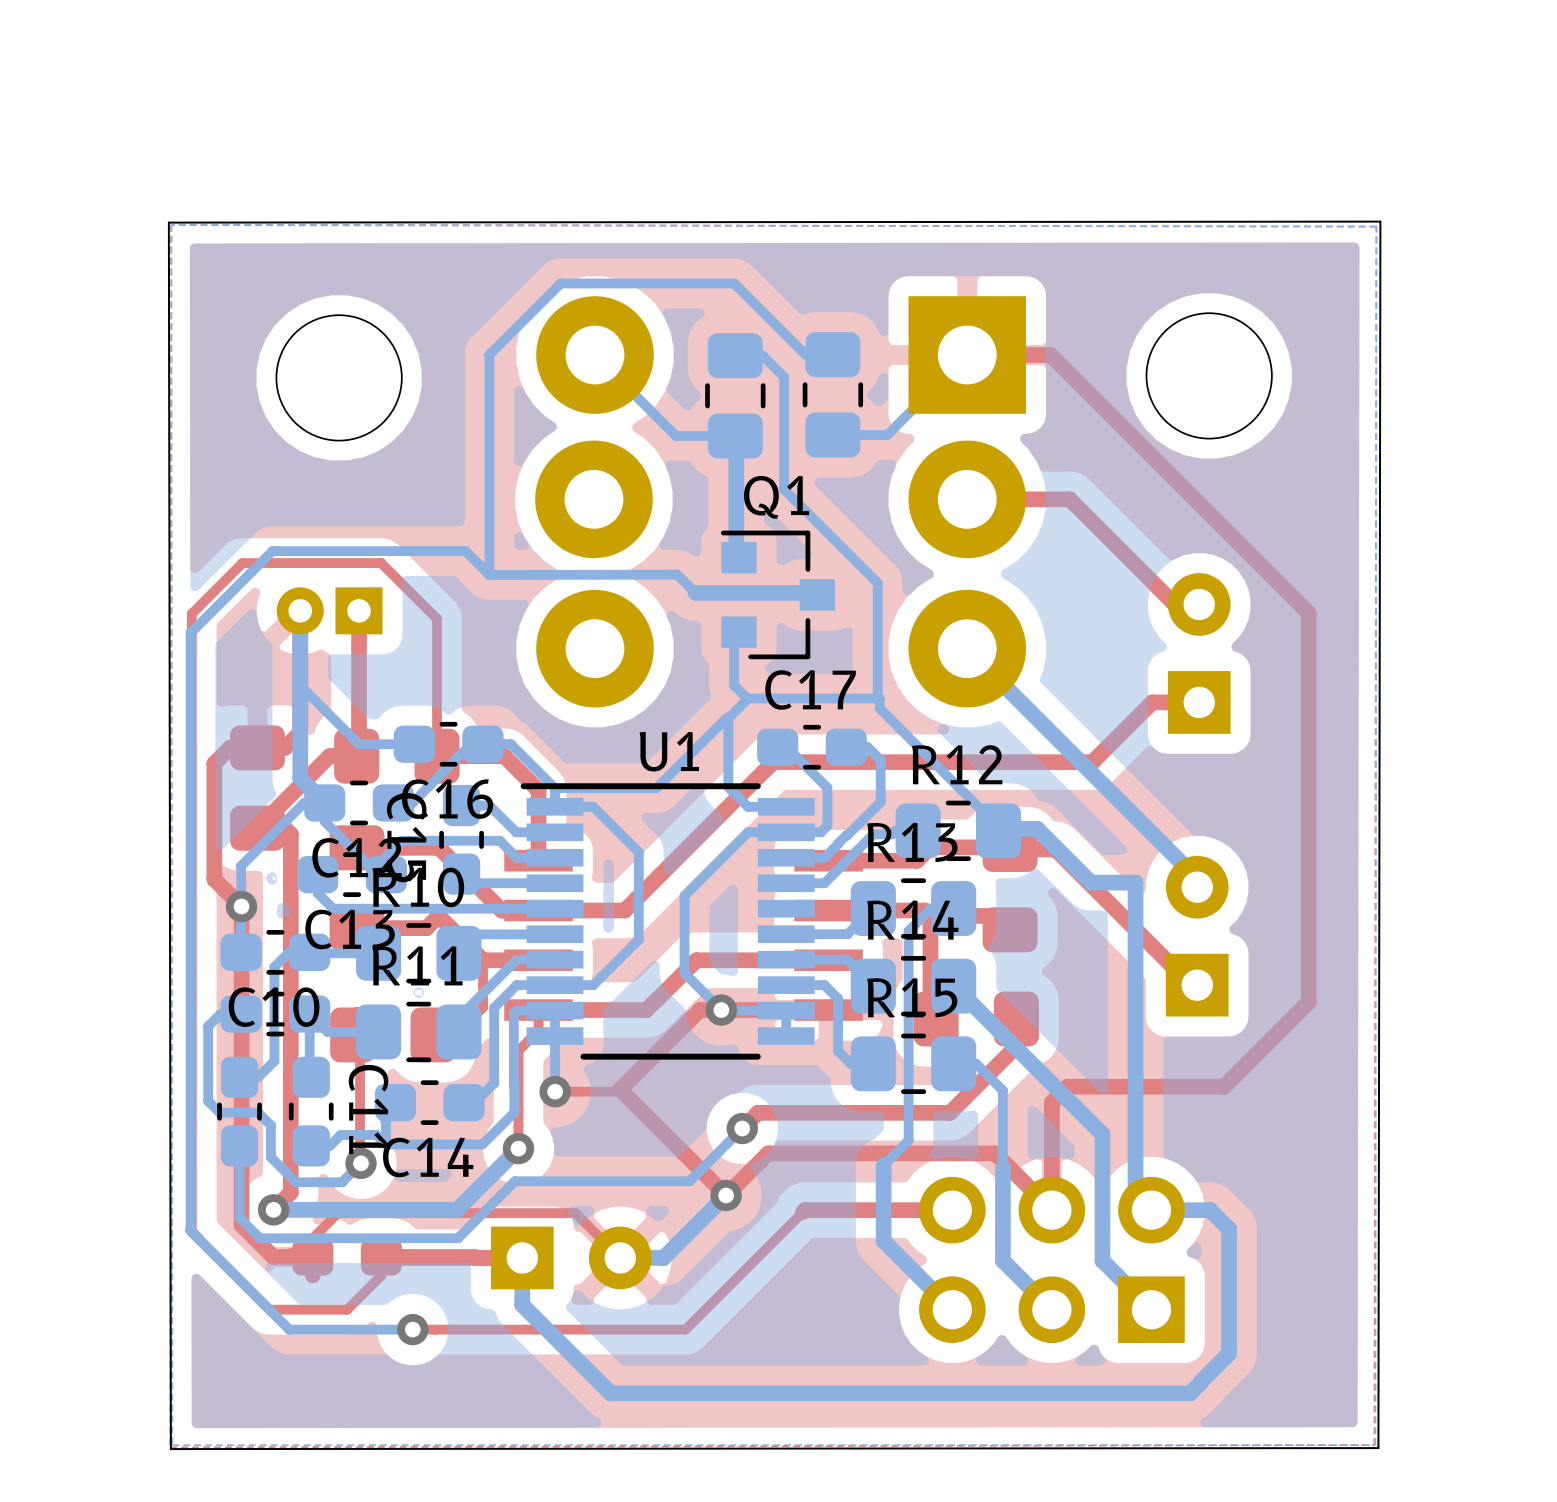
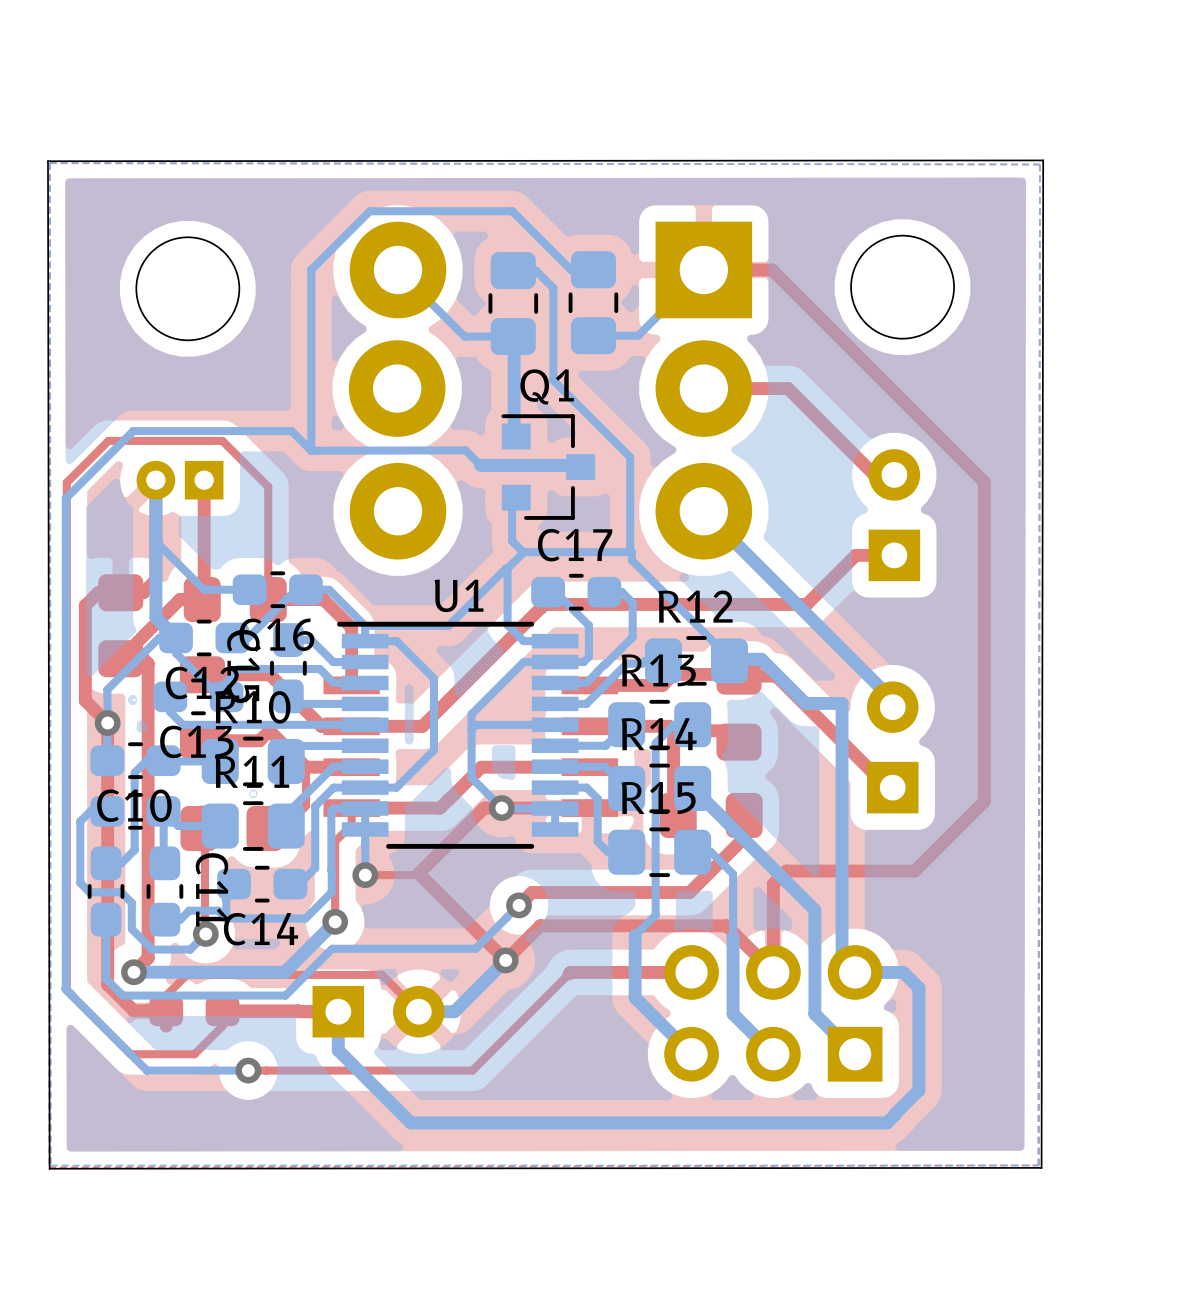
bottom track: none -> (555, 724) (476, 724) (471, 729)

